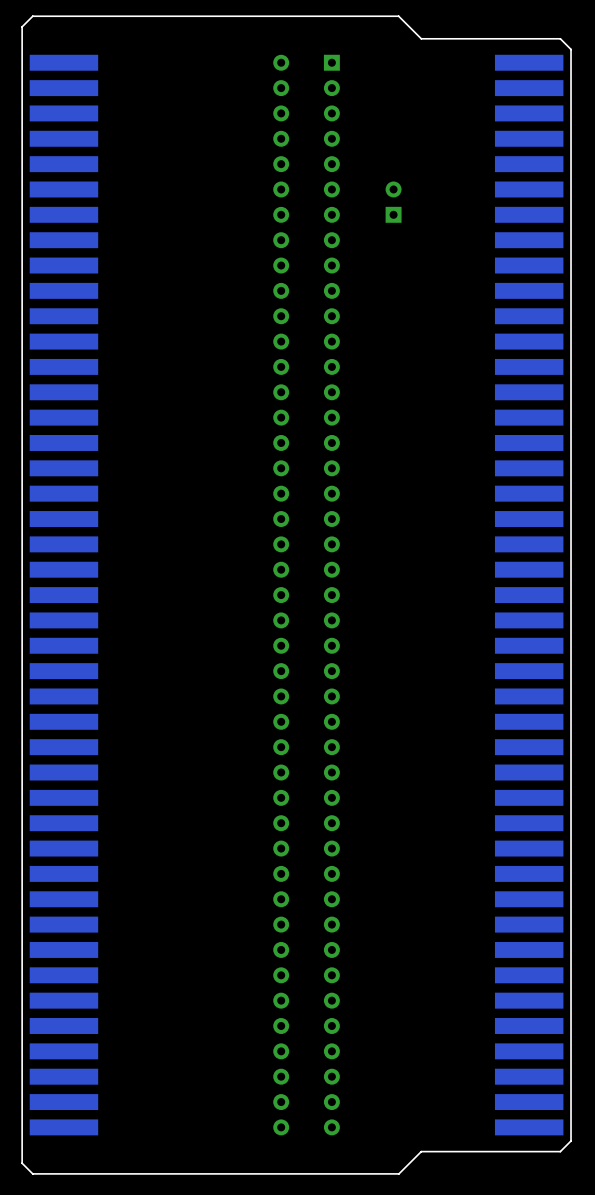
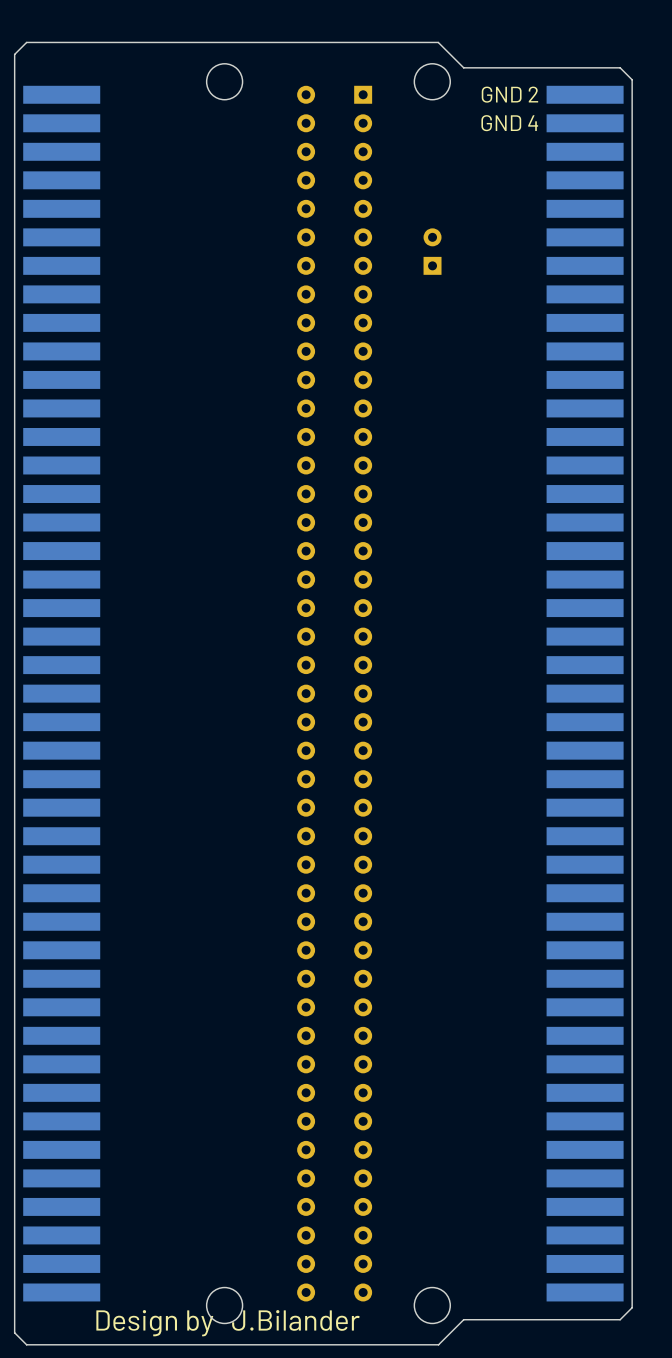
round board edge: none -> [206, 63, 243, 100]
round board edge: none -> [414, 63, 451, 100]
text: none -> GND 2 (509, 94)
text: none -> GND 4 (509, 123)
round board edge: none -> [206, 1287, 243, 1324]
round board edge: none -> [414, 1287, 451, 1324]
text: none -> Design by J.Bilander (227, 1323)

